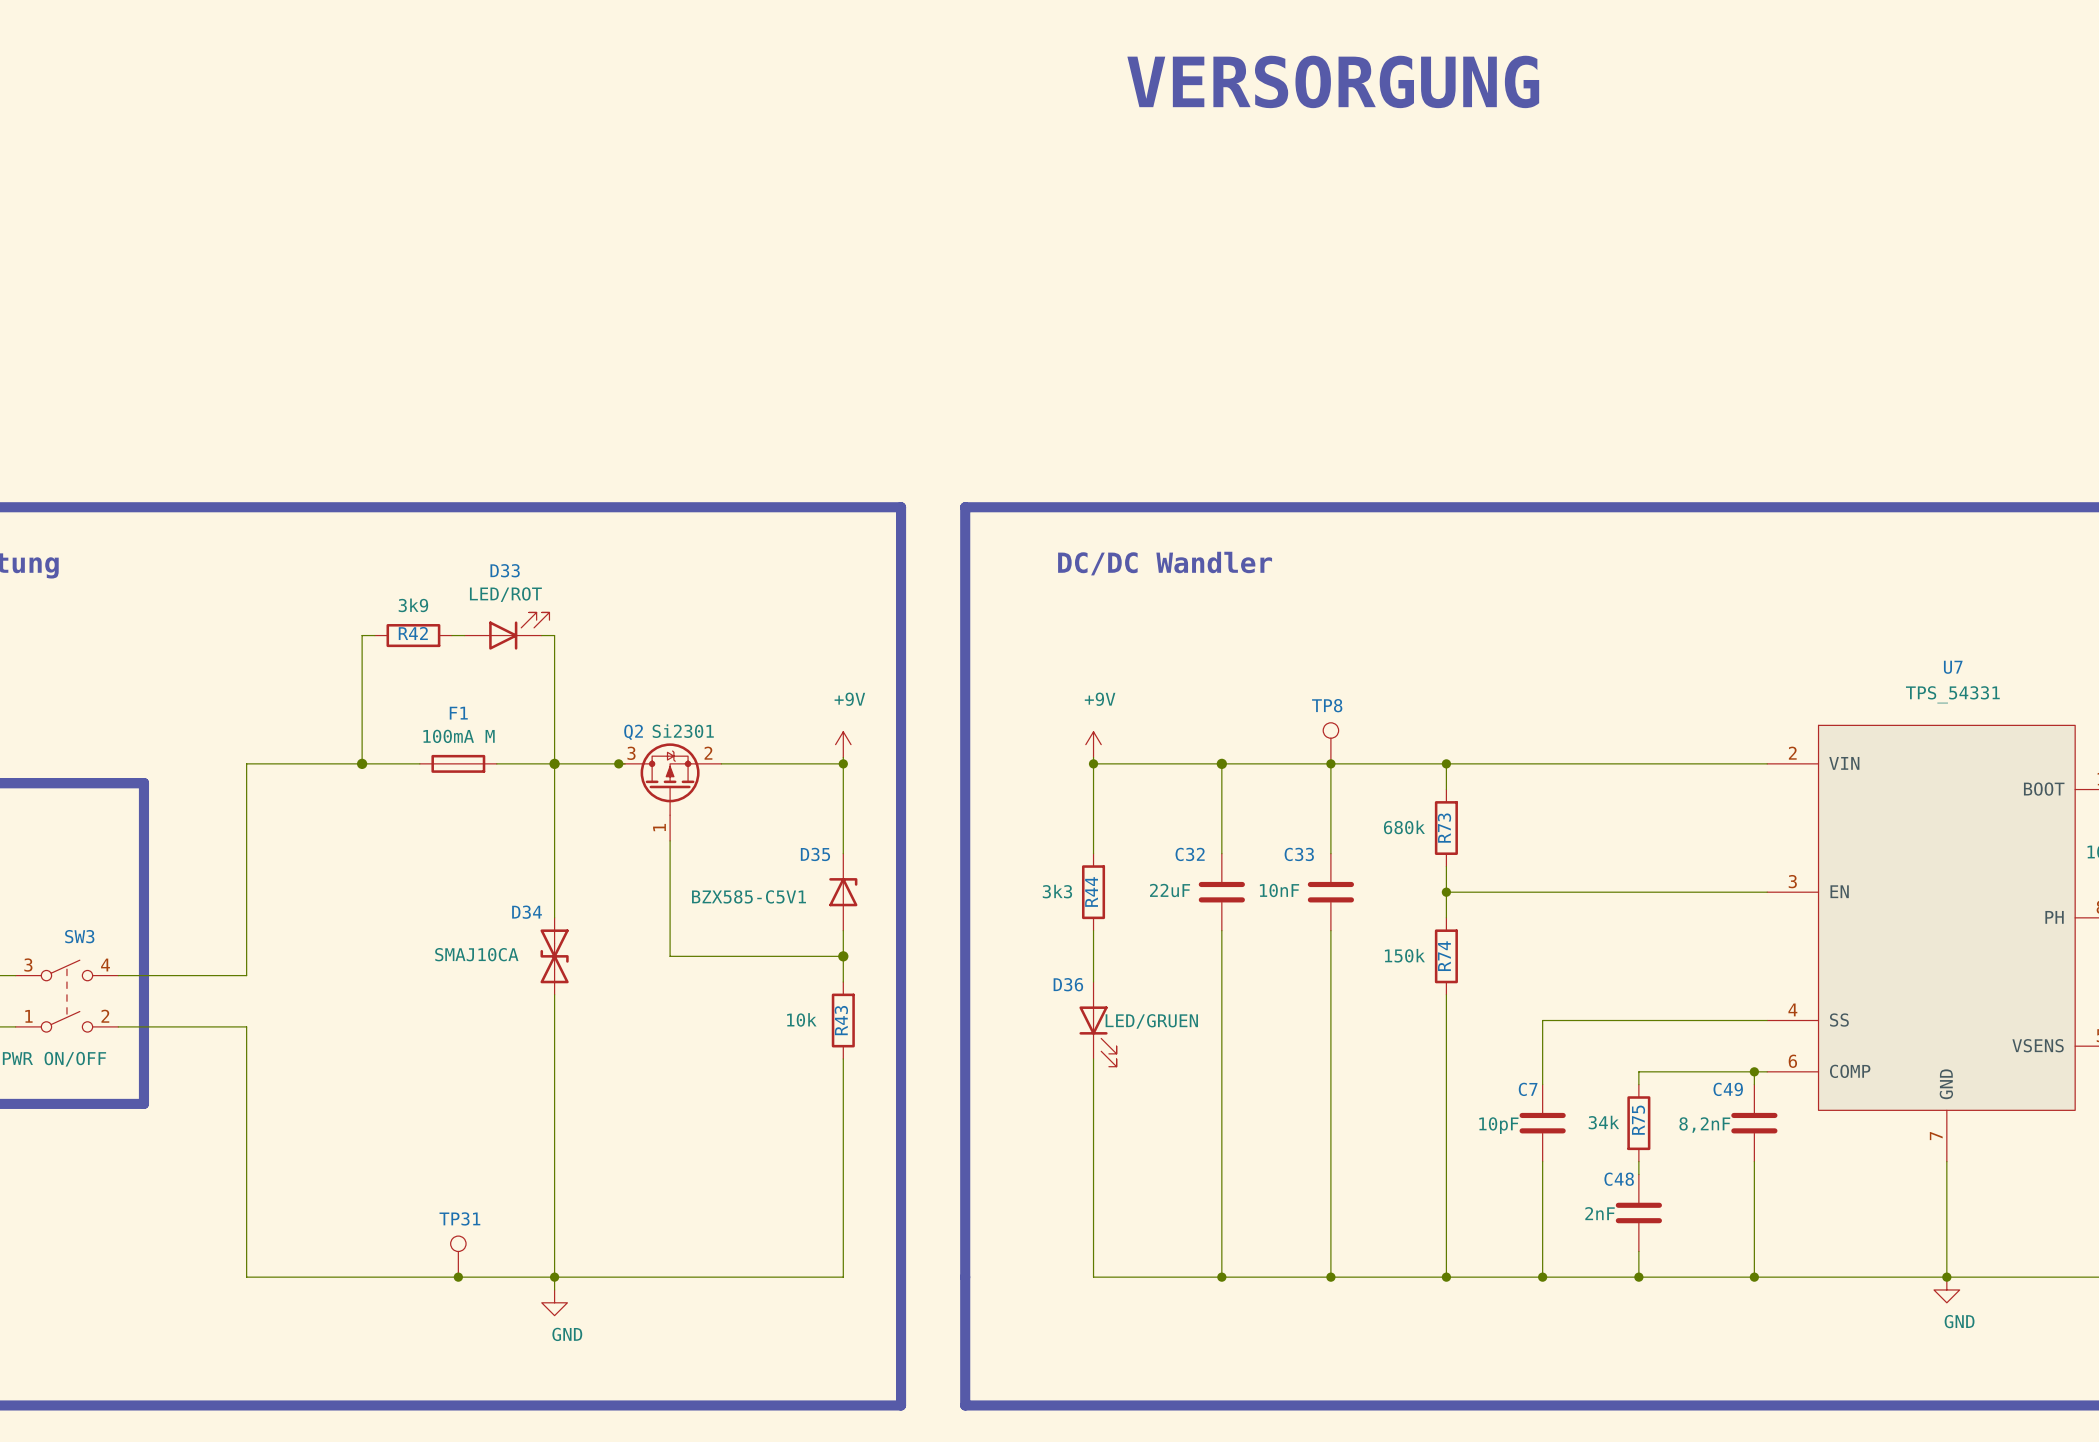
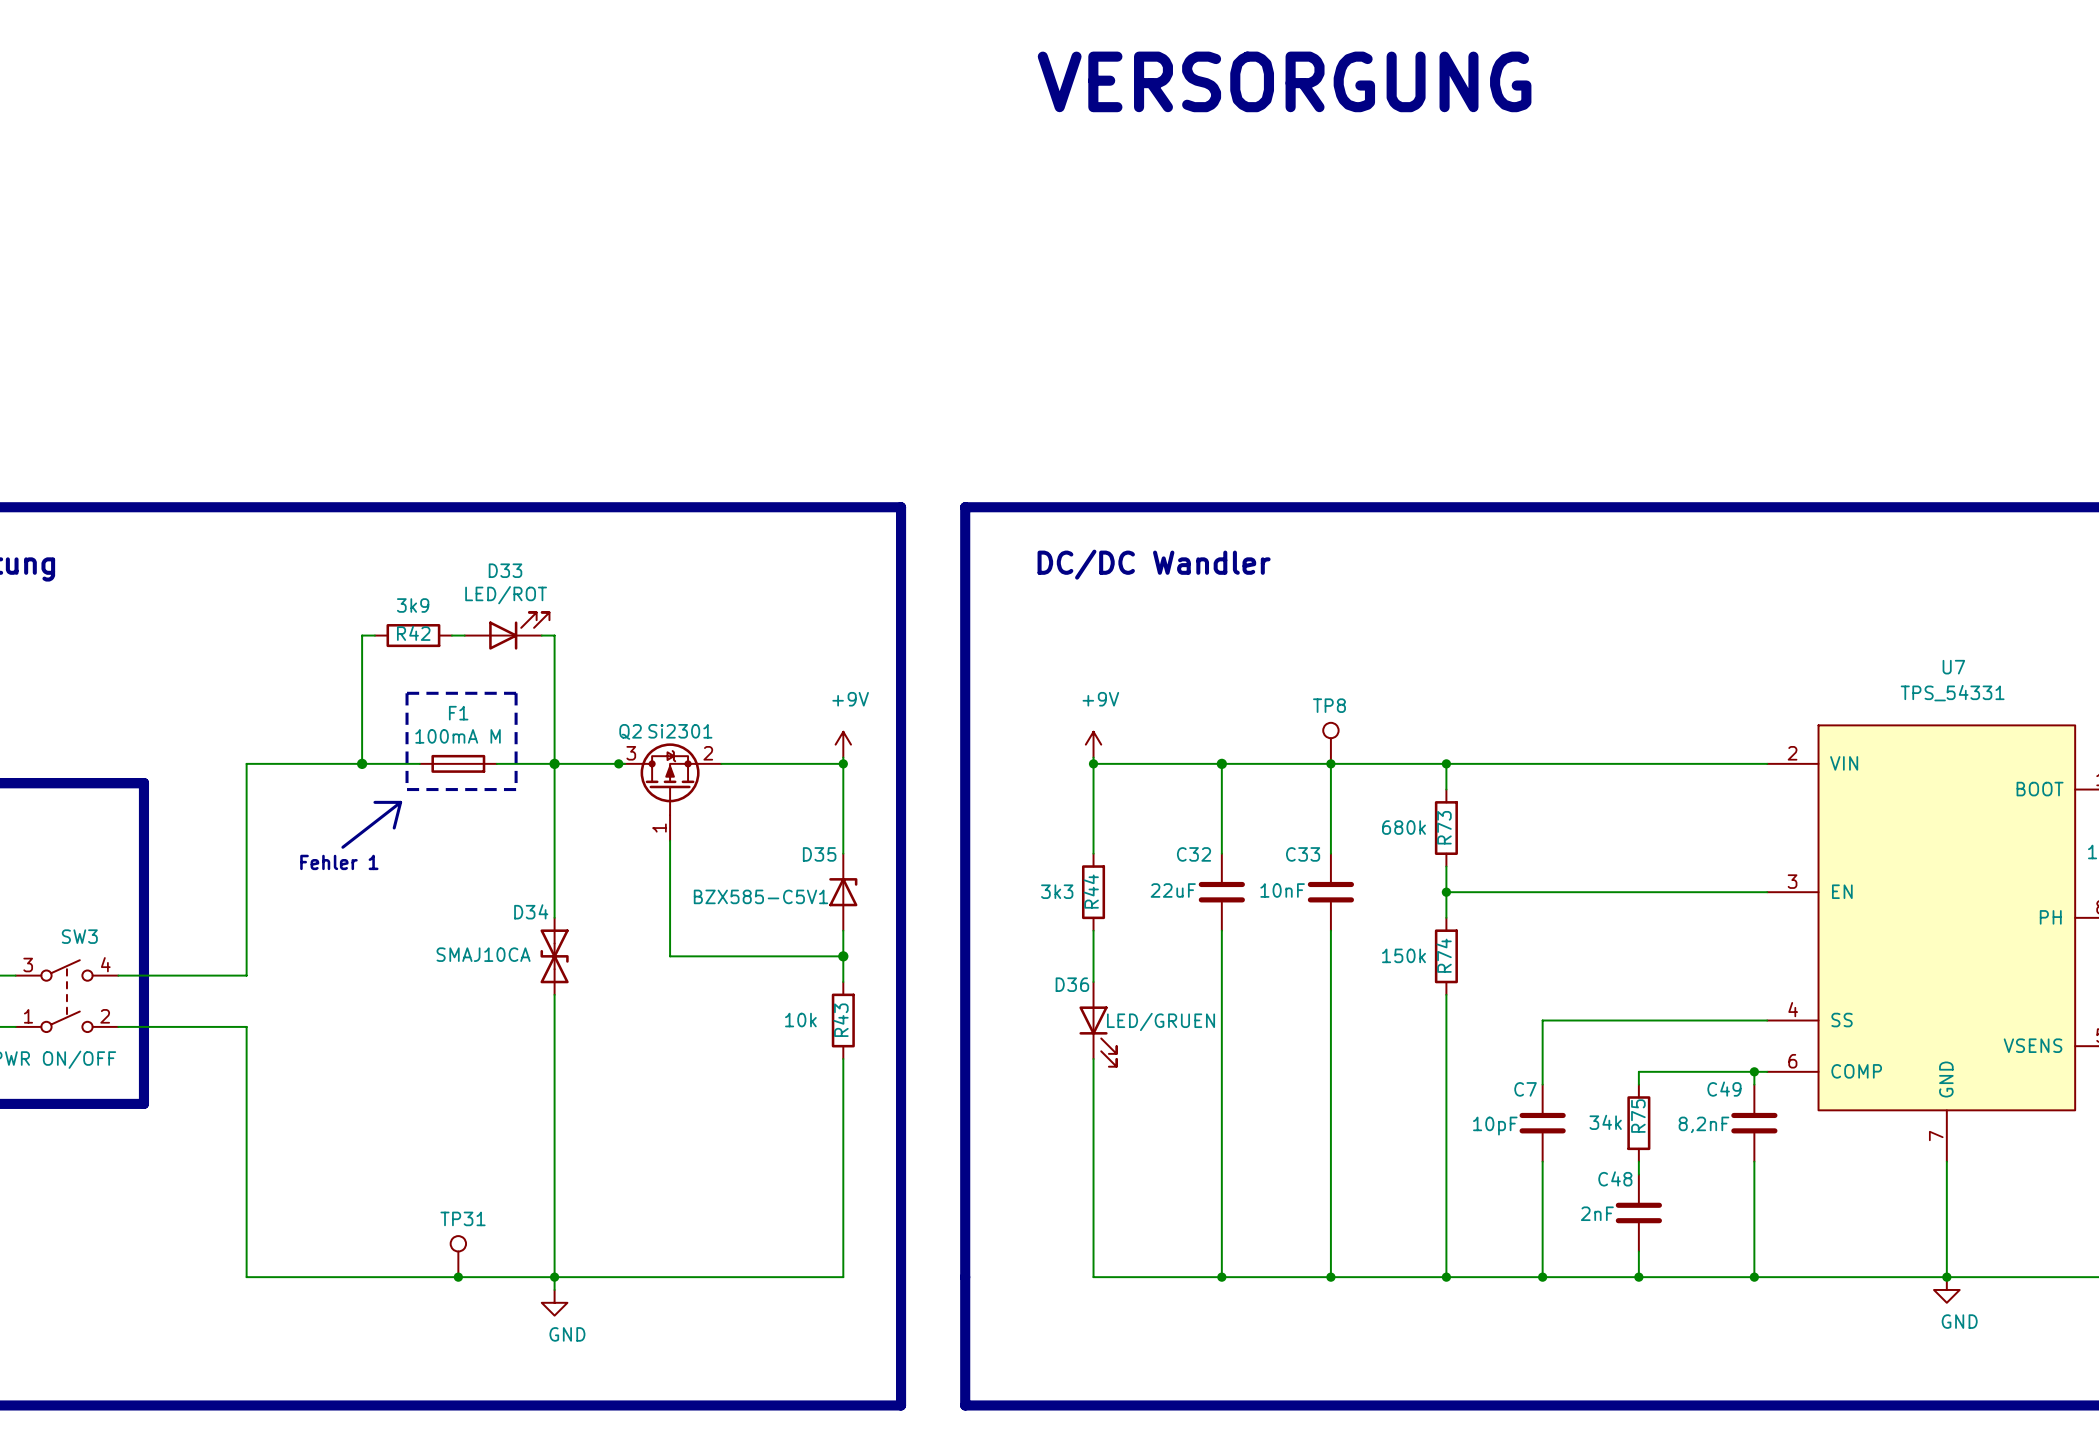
line: none -> (407, 693) (407, 789) (516, 789) (516, 693) (407, 693)
line: none -> (374, 802) (400, 802)
line: none -> (400, 802) (342, 847)
line: none -> (400, 802) (394, 828)
text: none -> Fehler 1 (339, 862)

